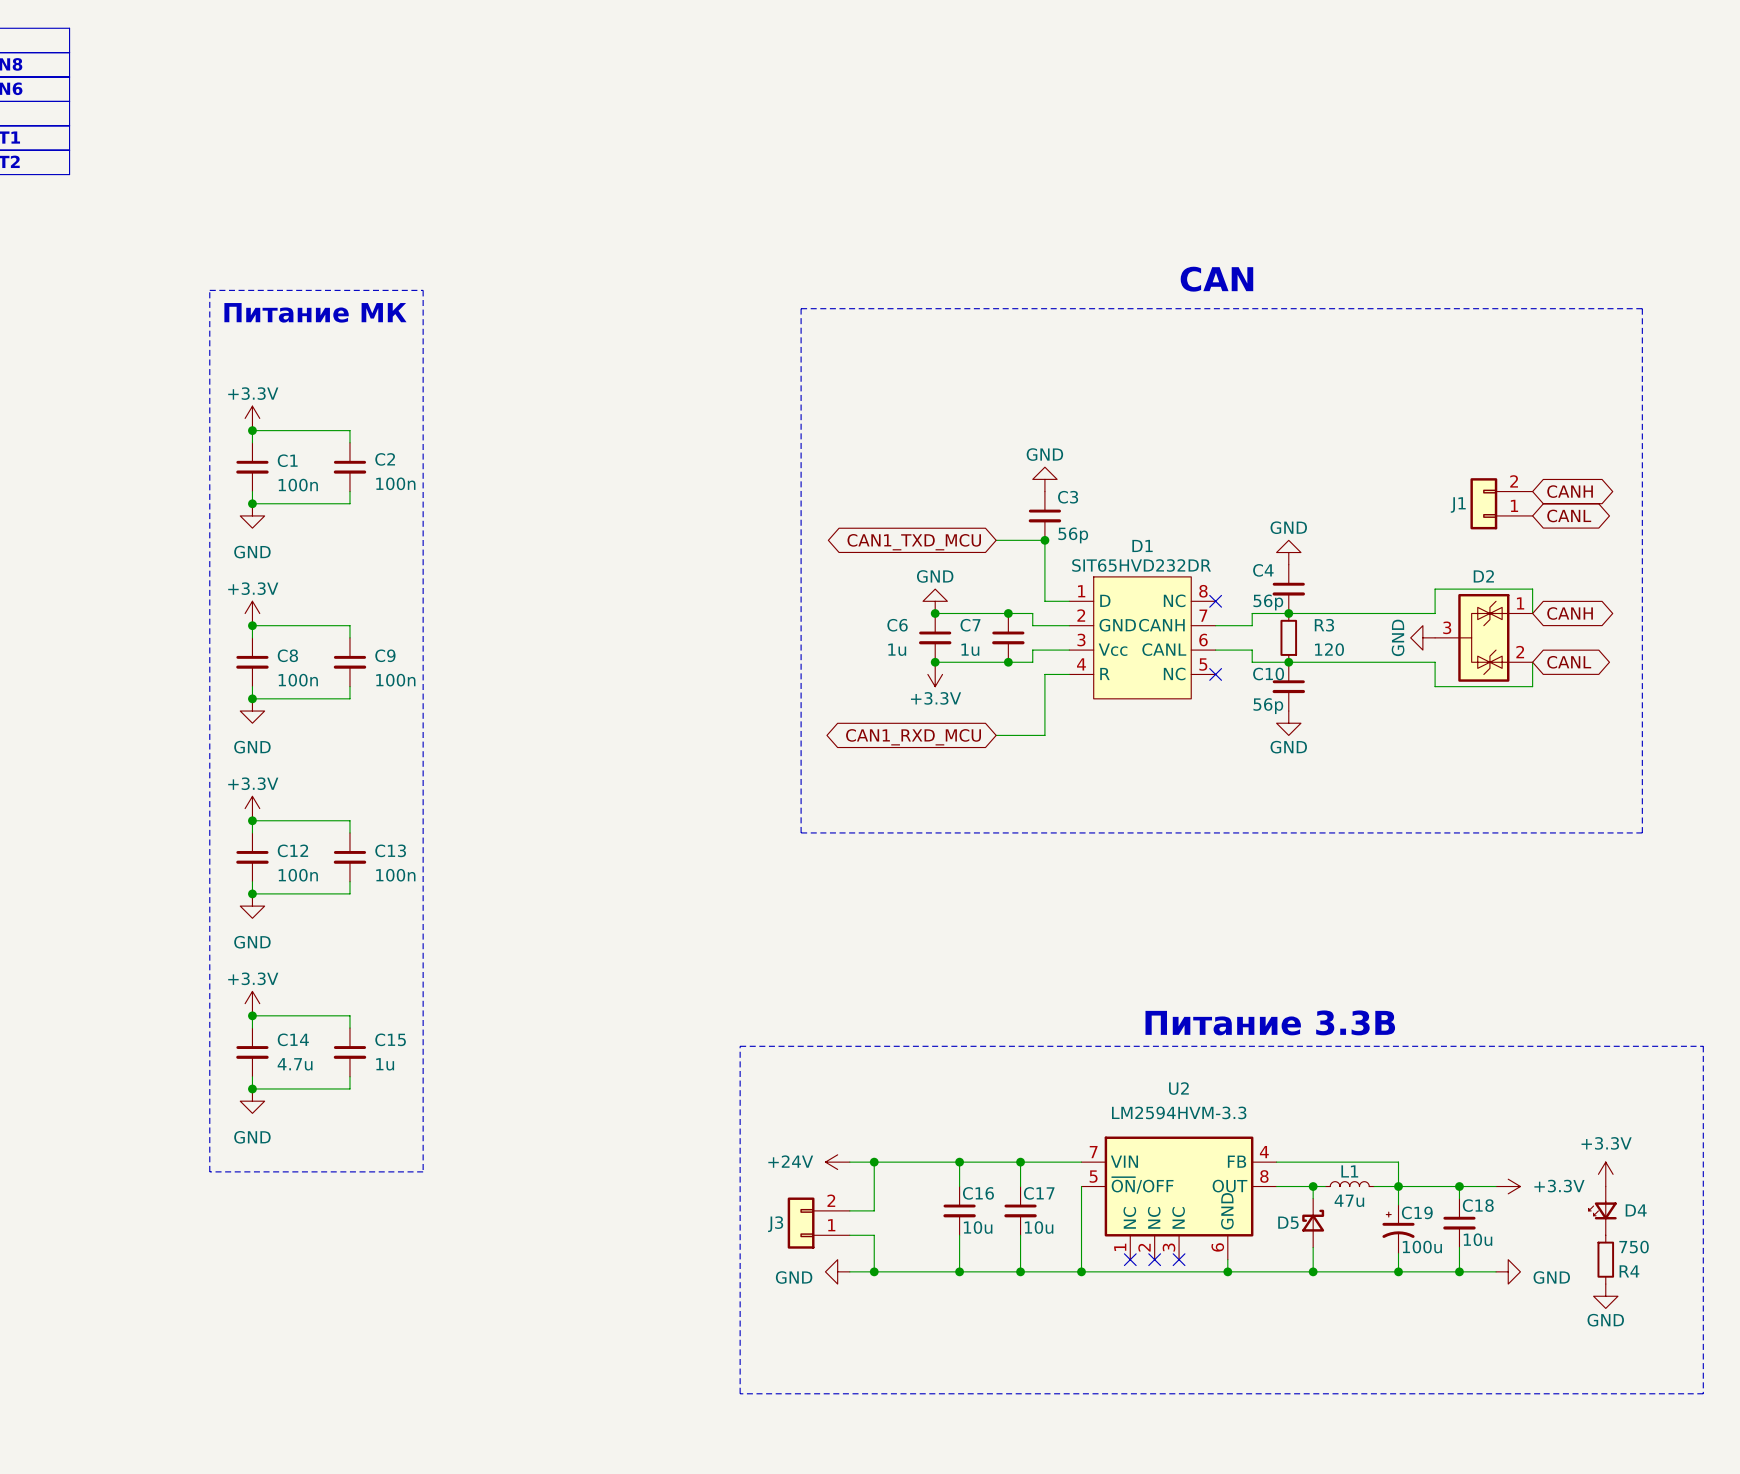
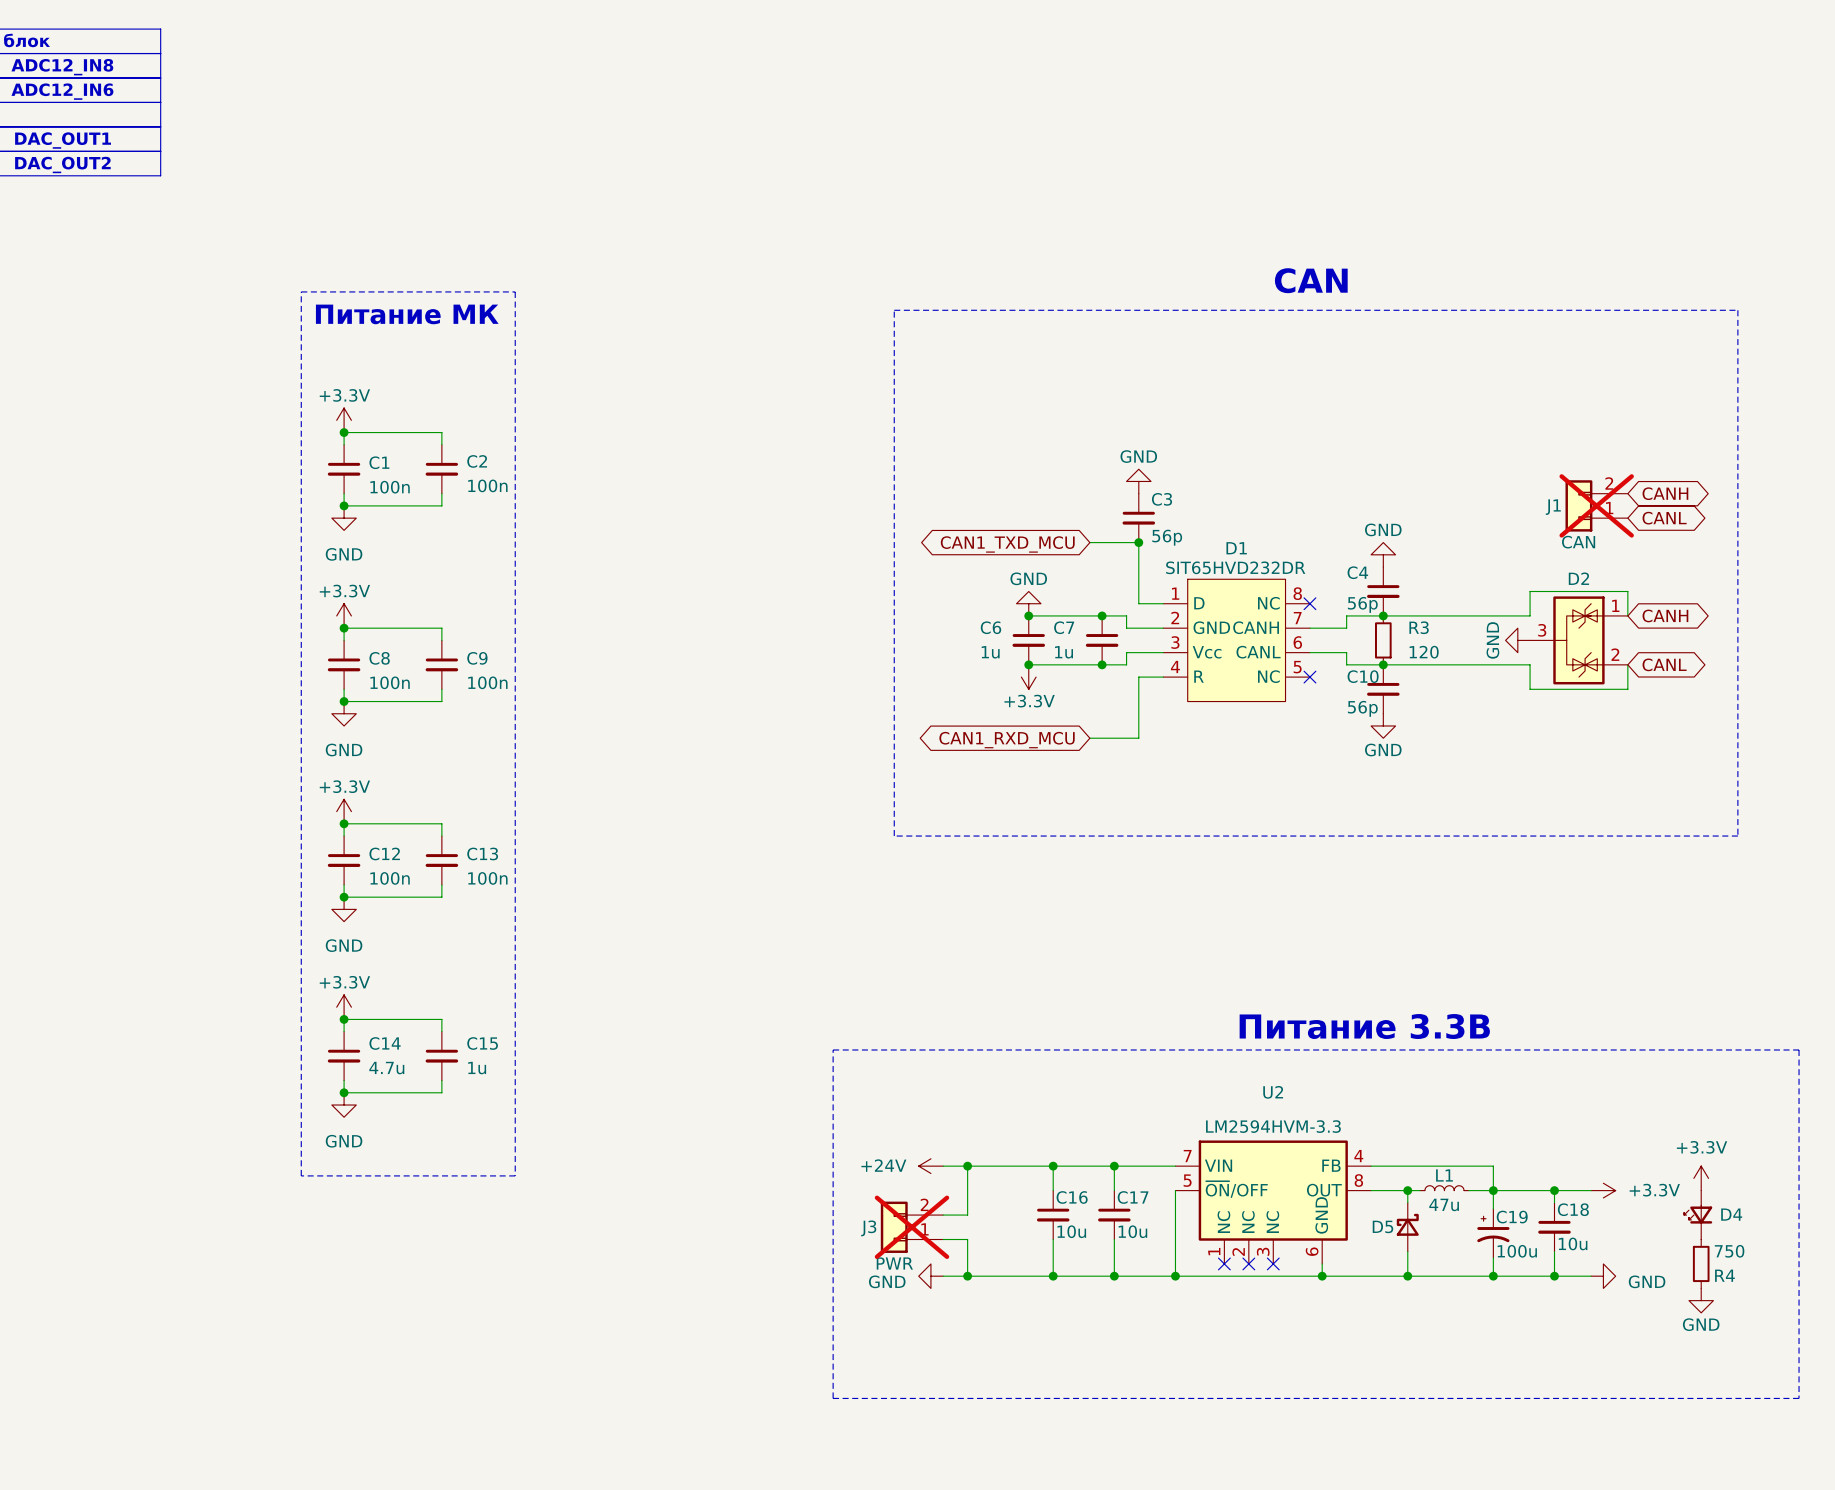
J1 do-not-place cross: none -> (1596, 505)
J1 text: none -> CAN (1578, 542)
U2 value: LM2594HVM-3.3 (1179, 1112) -> none
U2 text: none -> LM2594HVM-3.3 (1273, 1126)
J3 do-not-place cross: none -> (911, 1227)
J3 text: none -> PWR (894, 1263)

